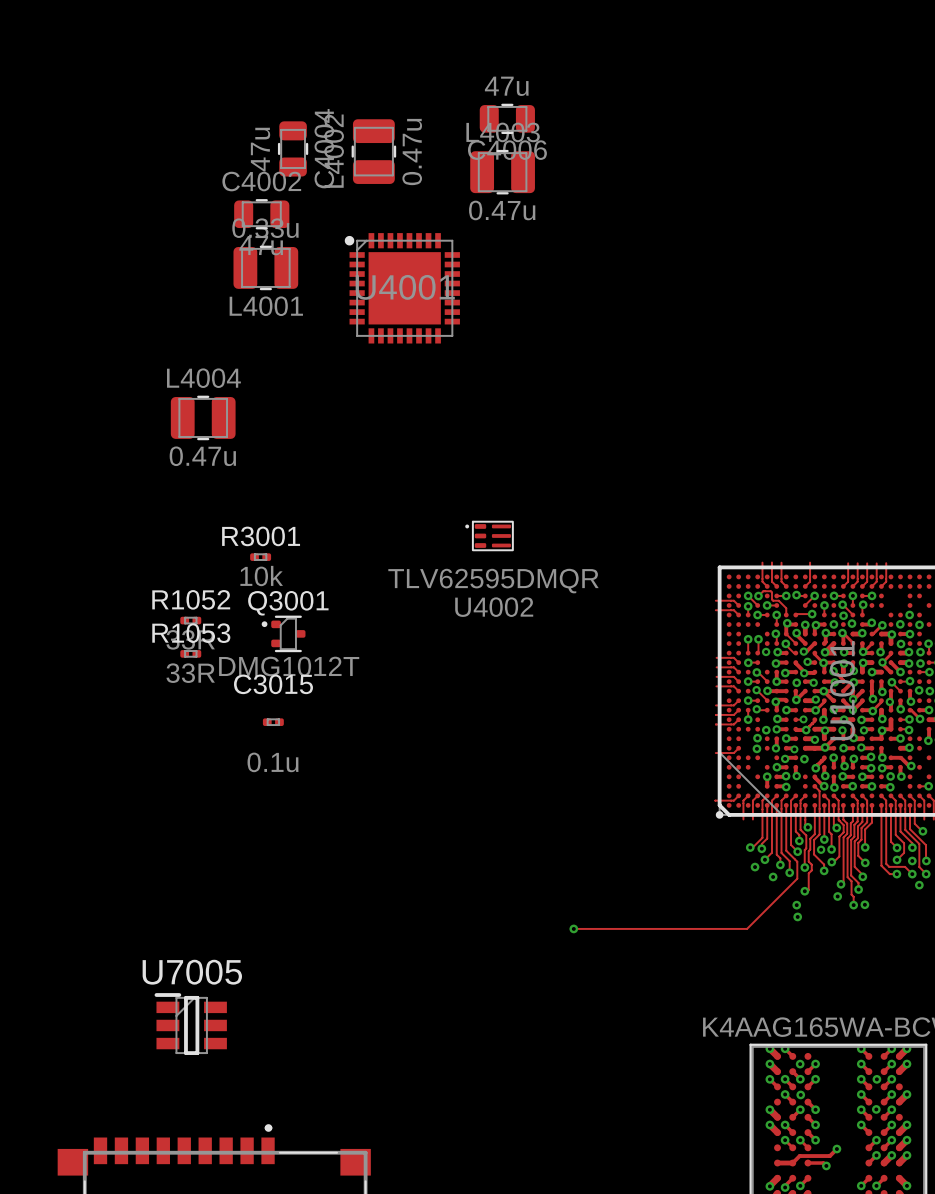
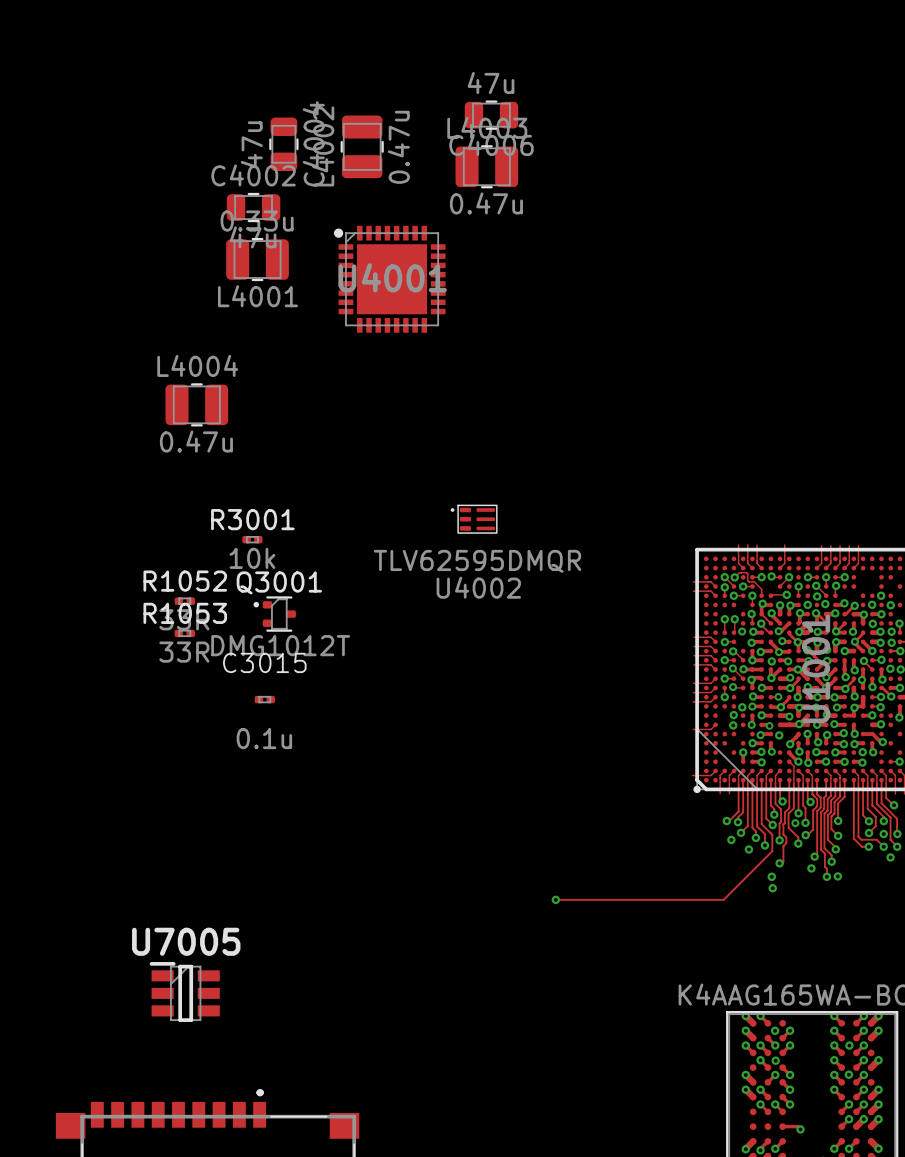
track: (836, 1149) (829, 1156) (799, 1156) (792, 1163) (777, 1163) -> none
via: (836, 1149) -> none

